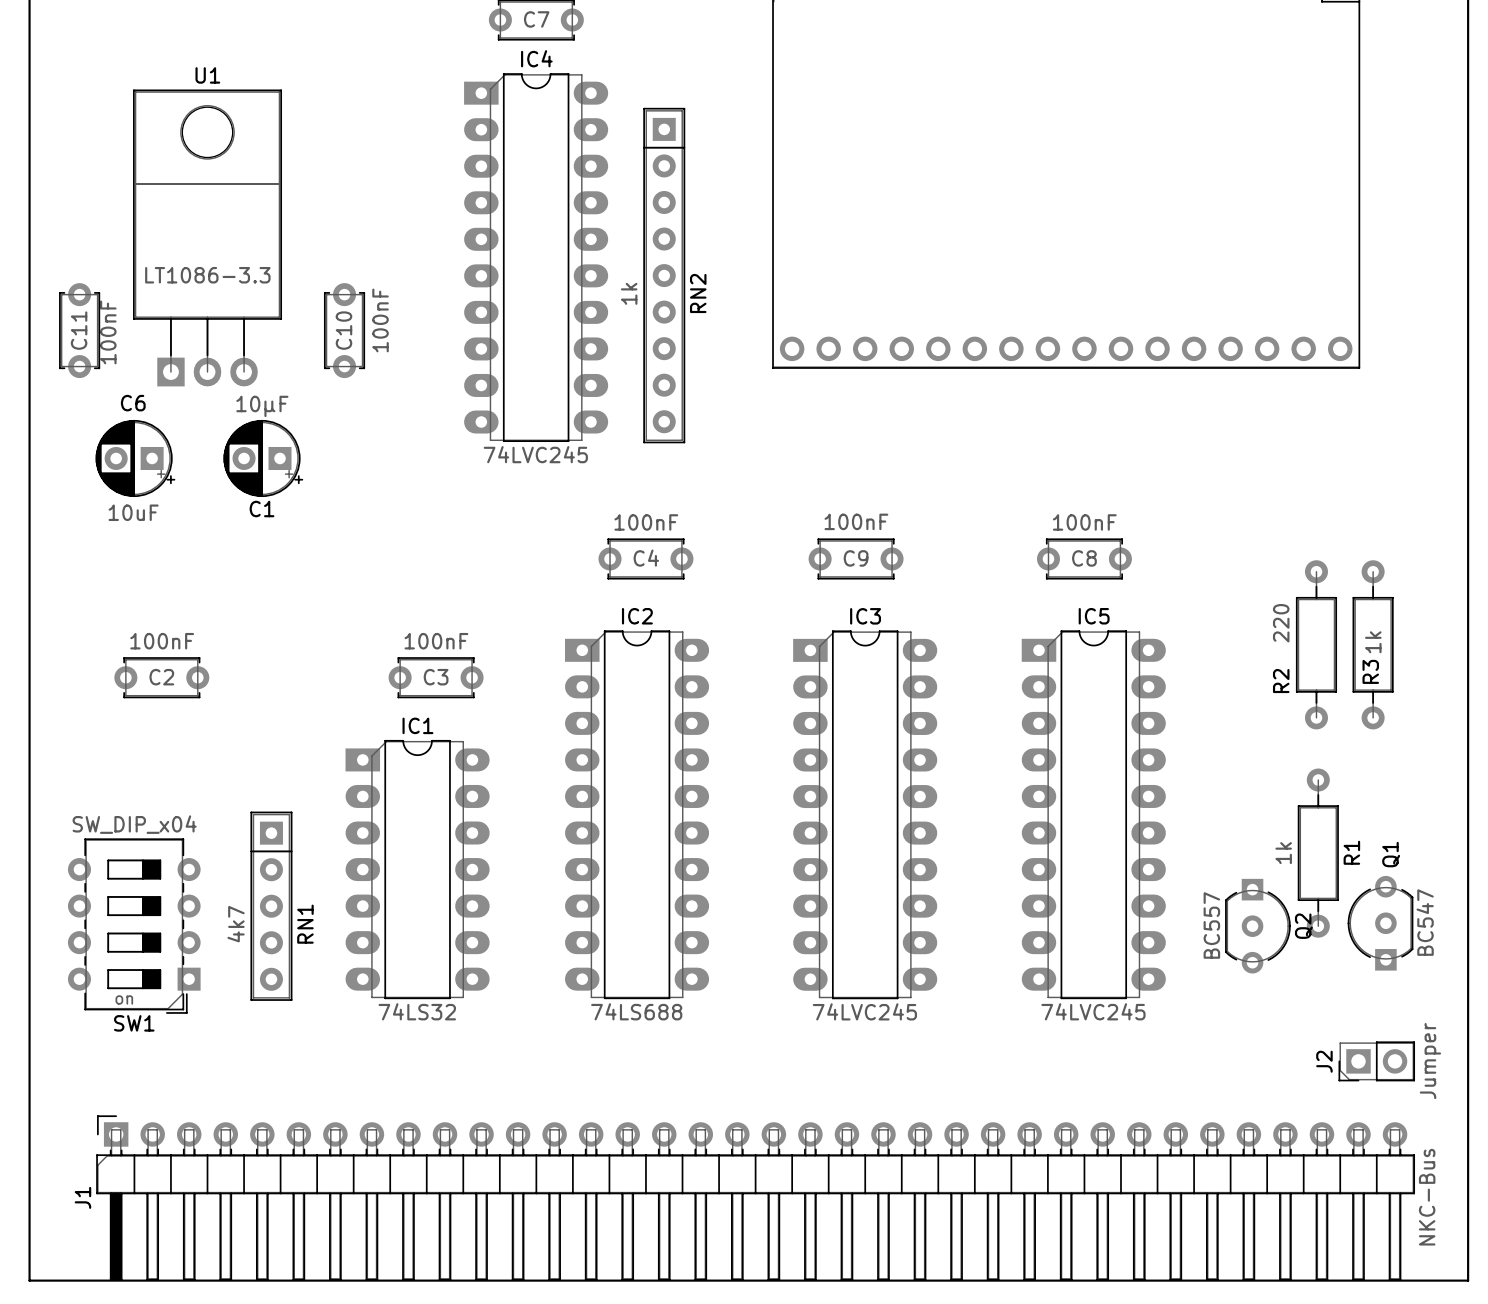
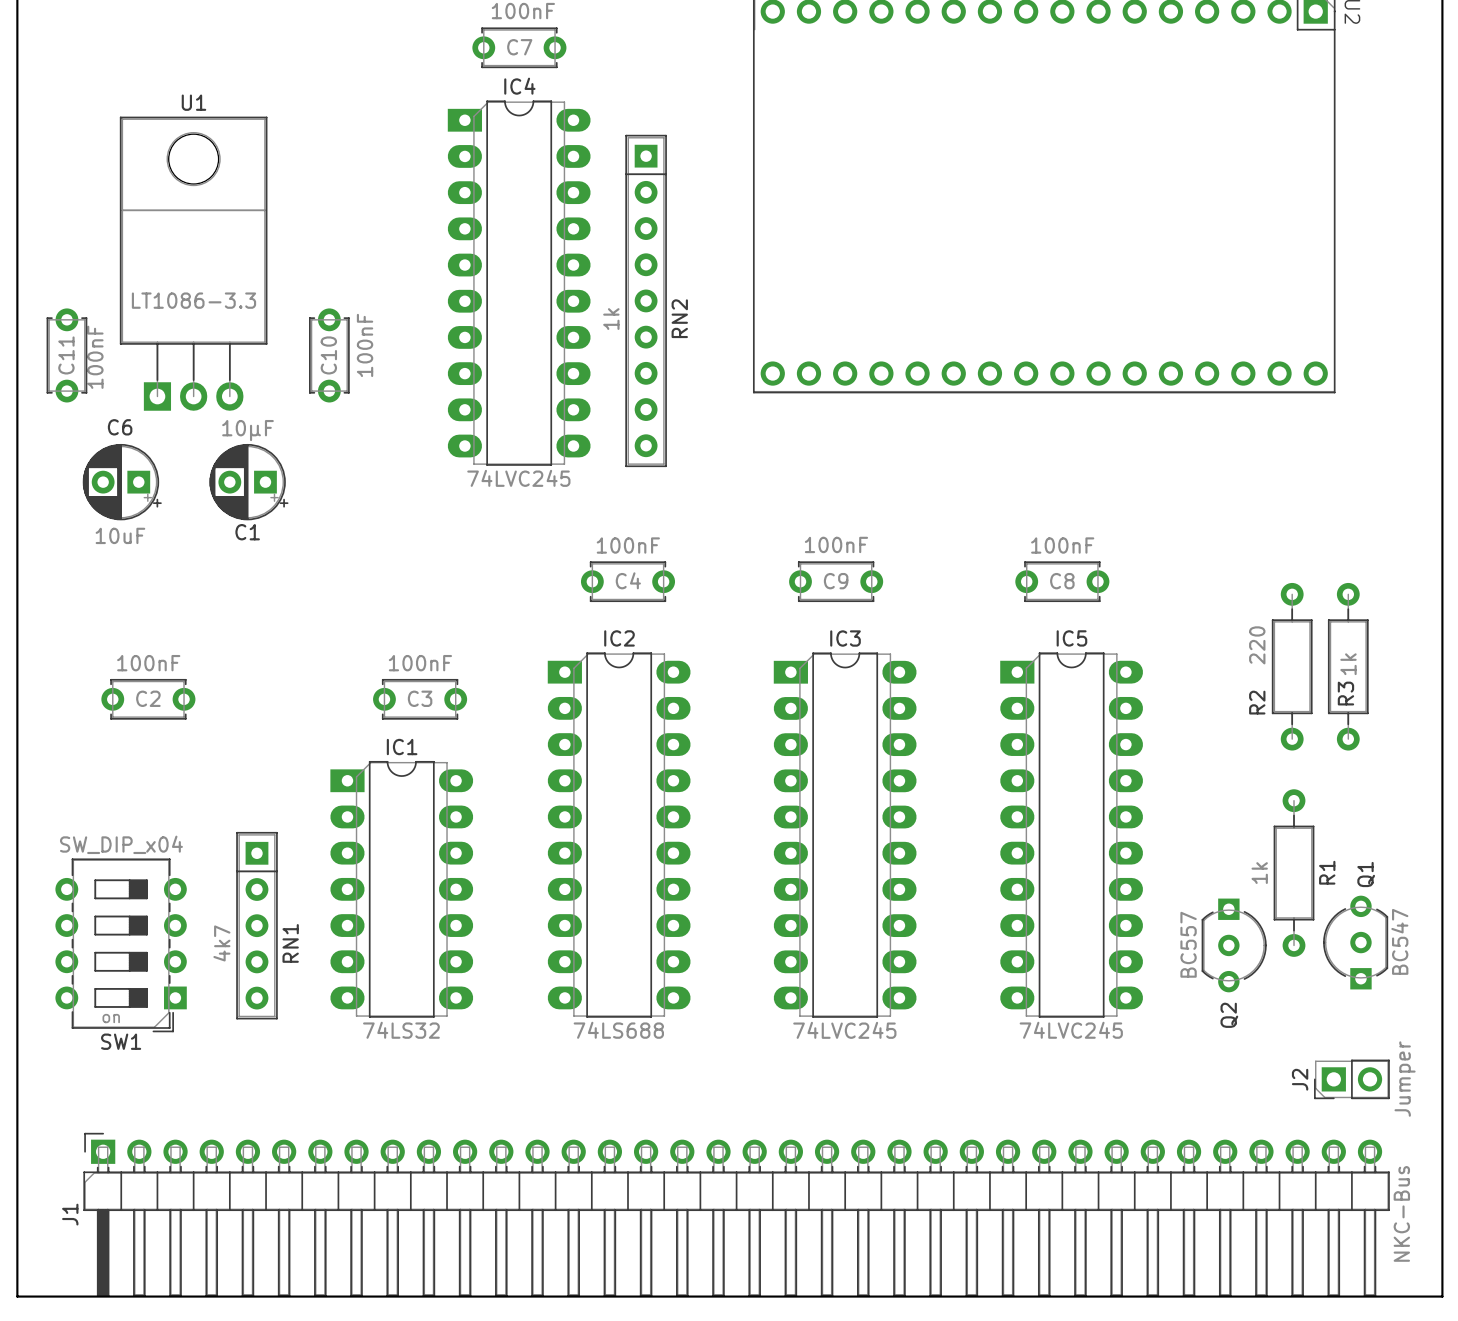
Q2 name position: Q2 (1303, 926) -> Q2 (1229, 1015)

